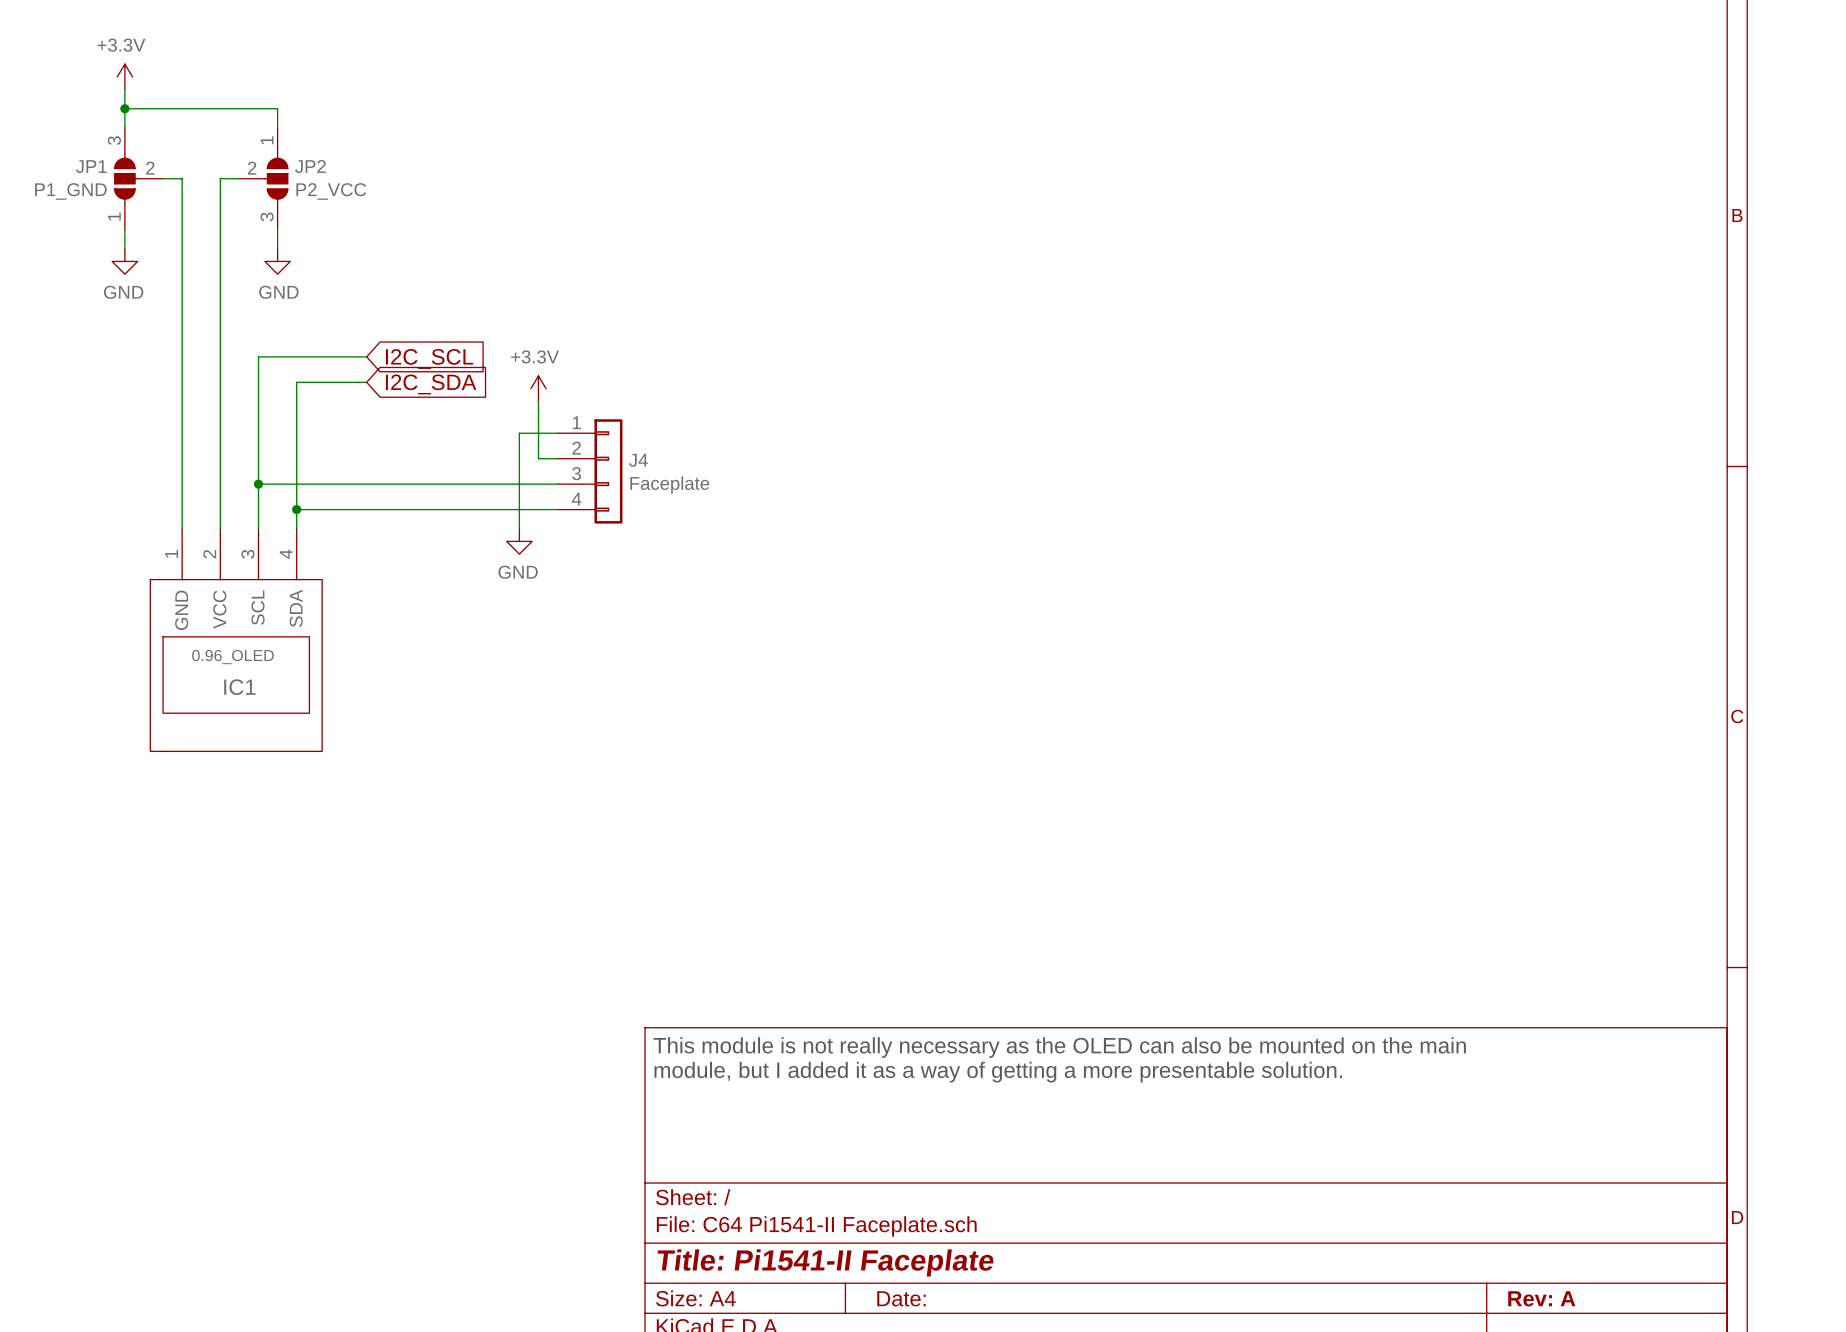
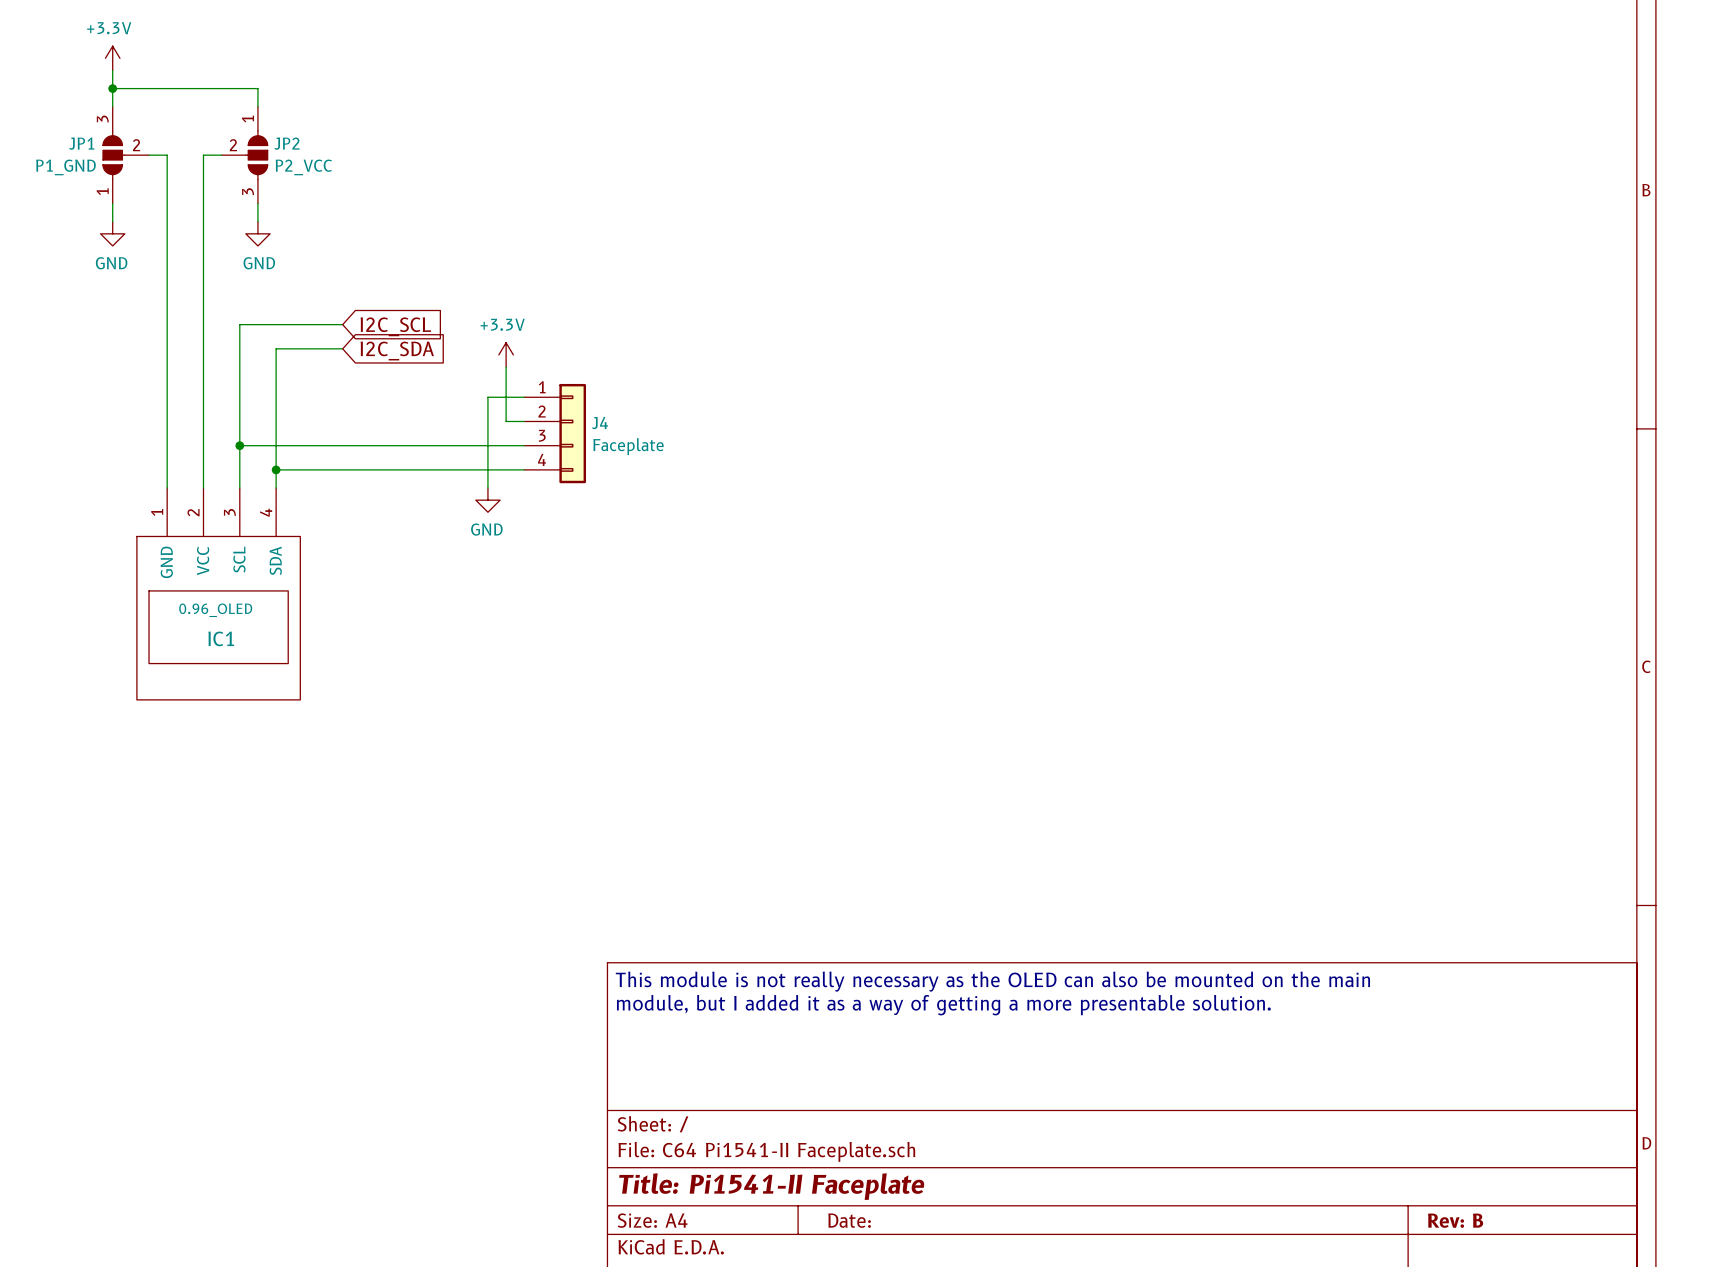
title block: Rev: A (1541, 1298) -> Rev: B (1455, 1220)

